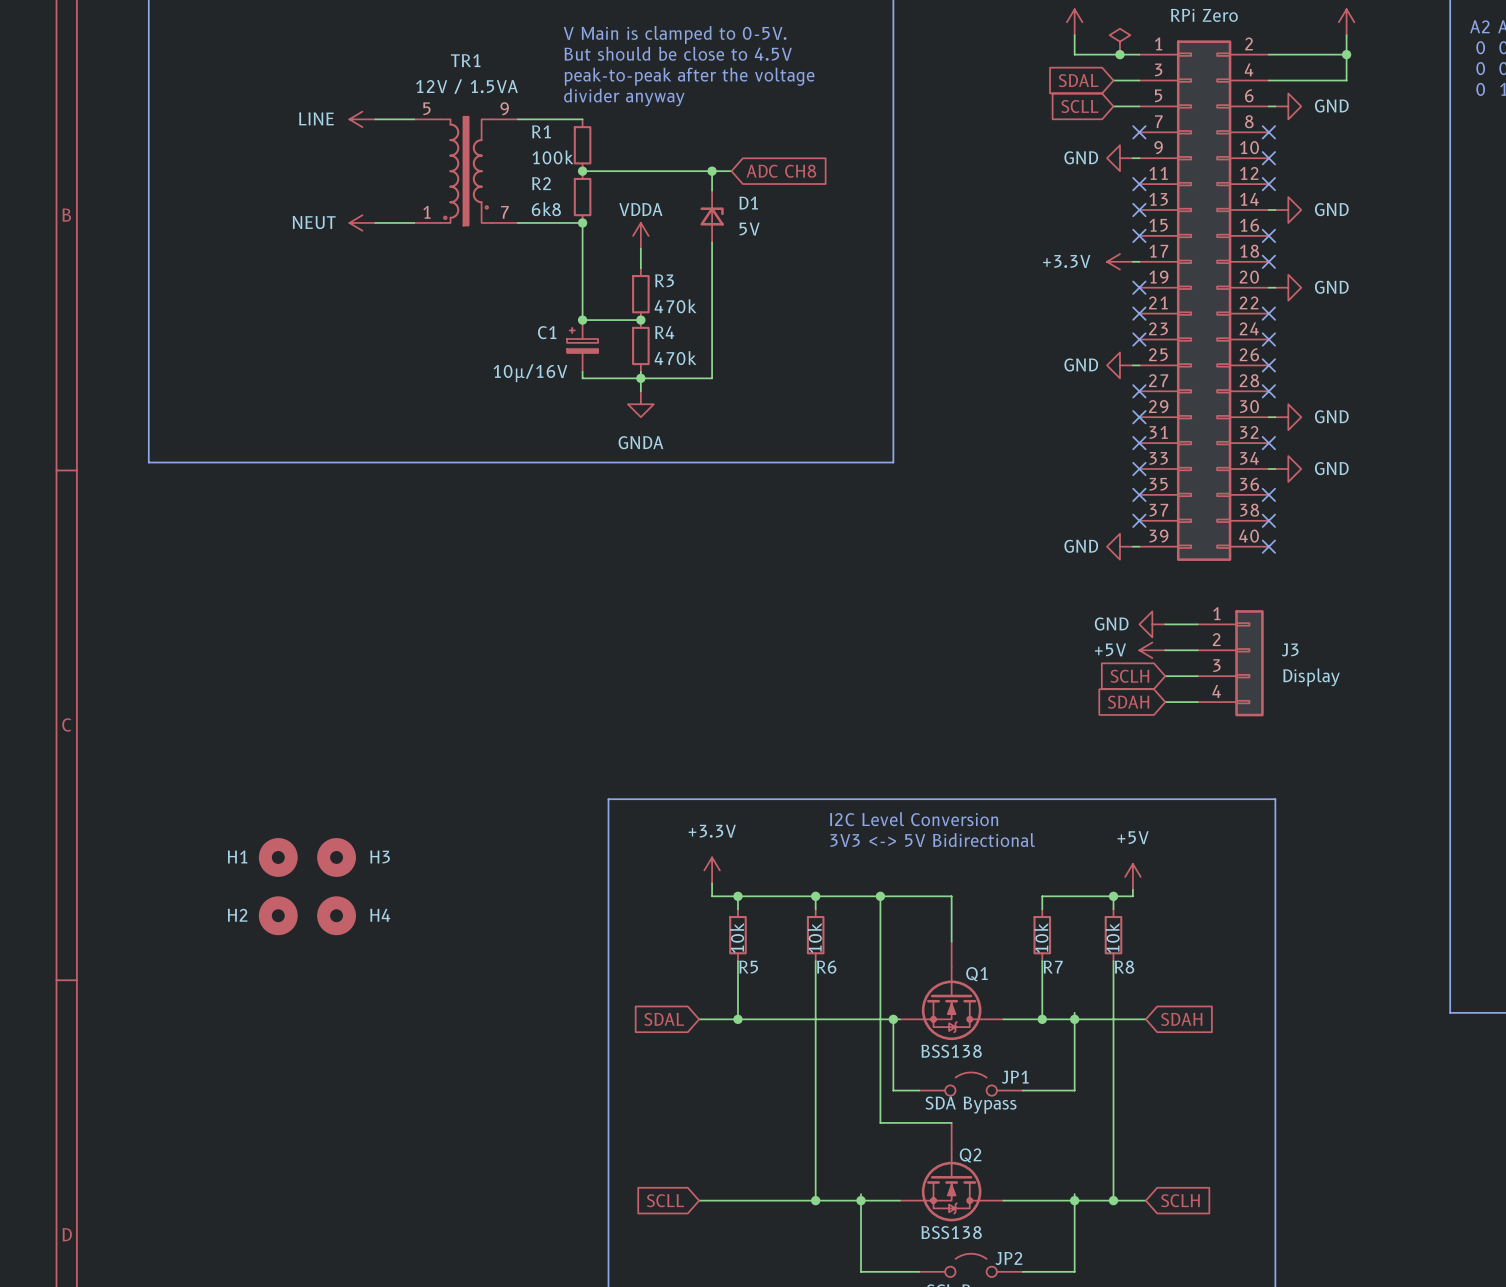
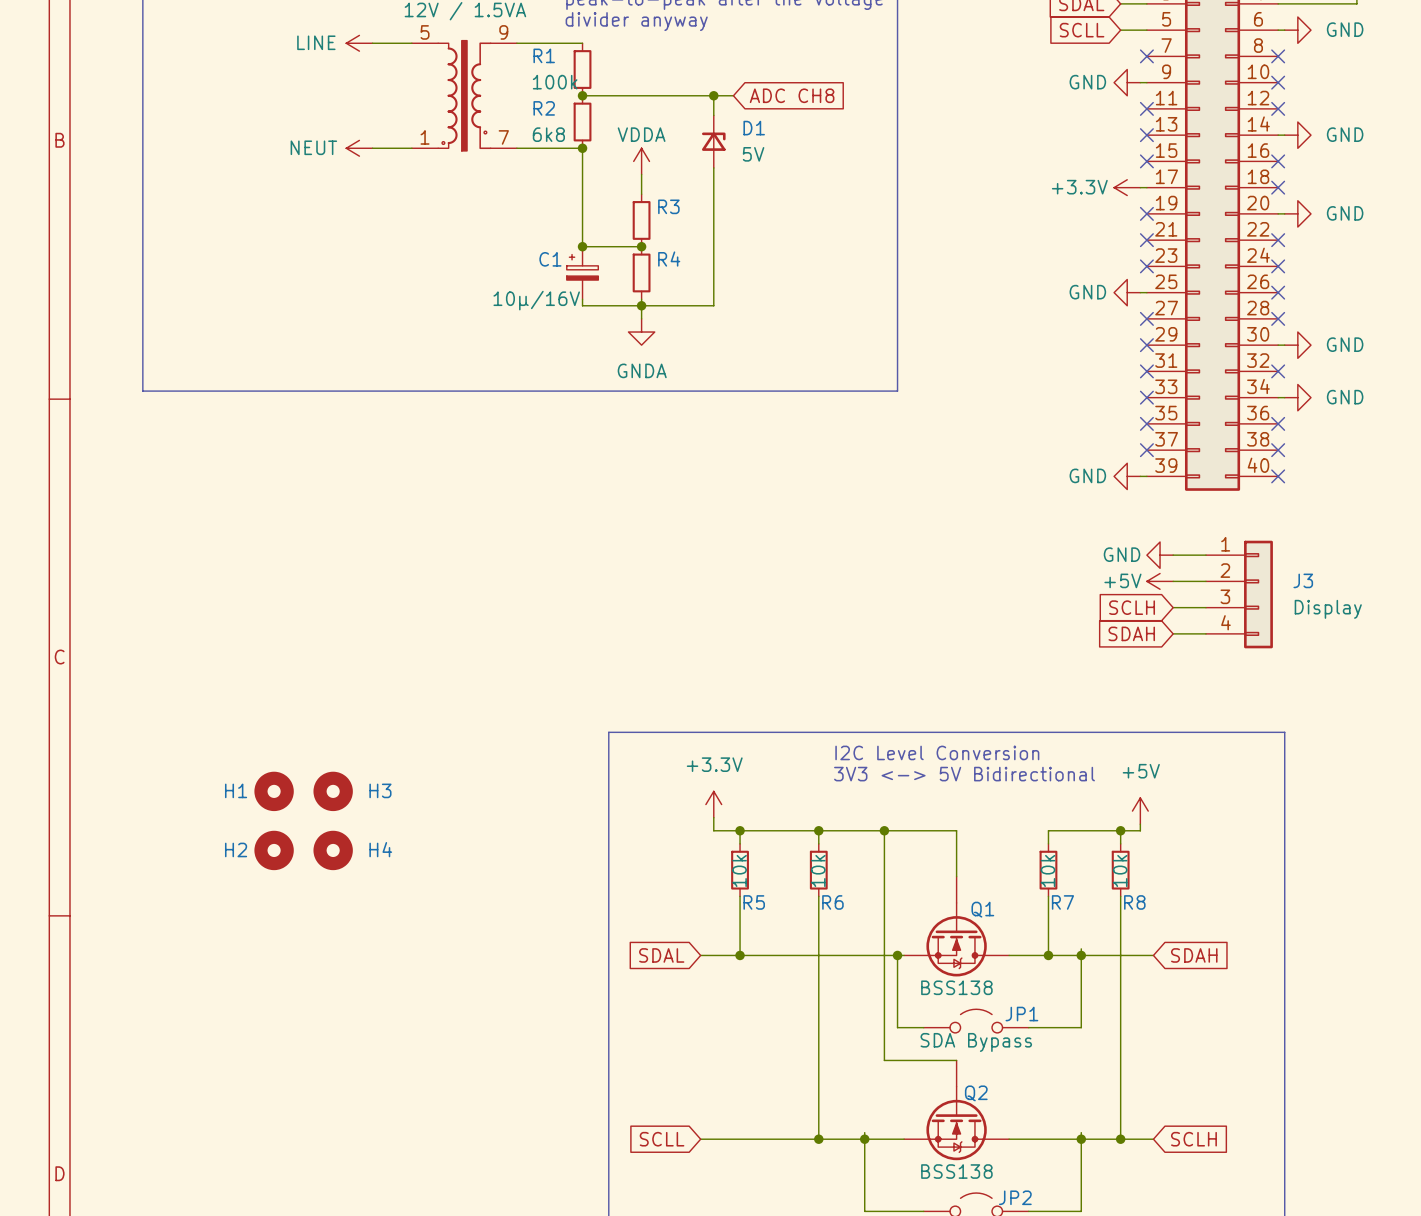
R3 value: 470k (675, 306) -> none
R4 value: 470k (675, 358) -> none

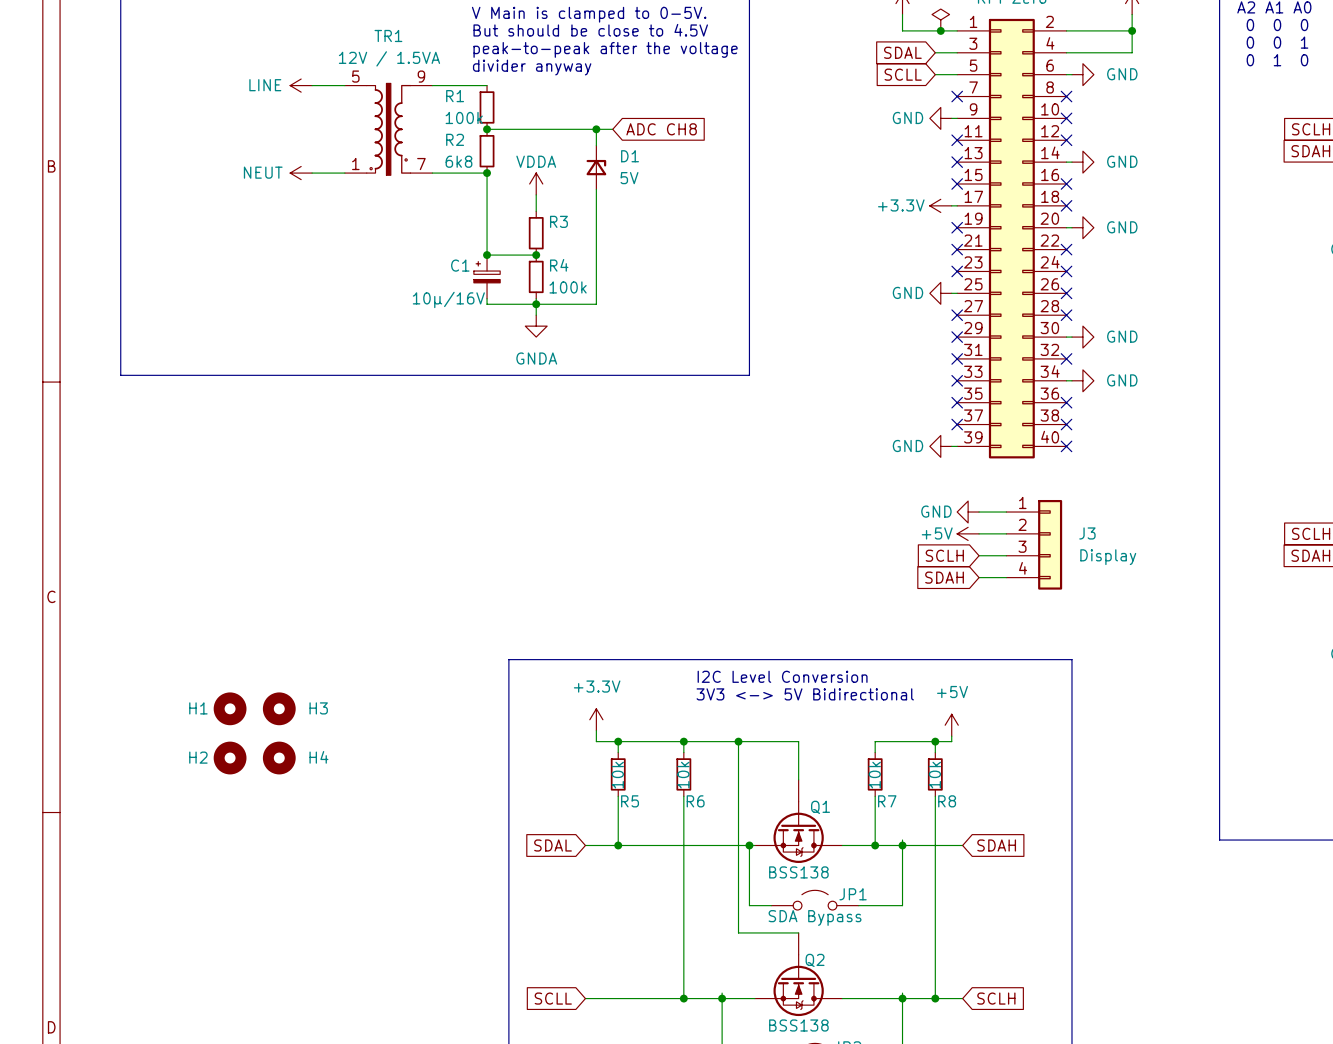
R4 value: none -> 100k (568, 287)

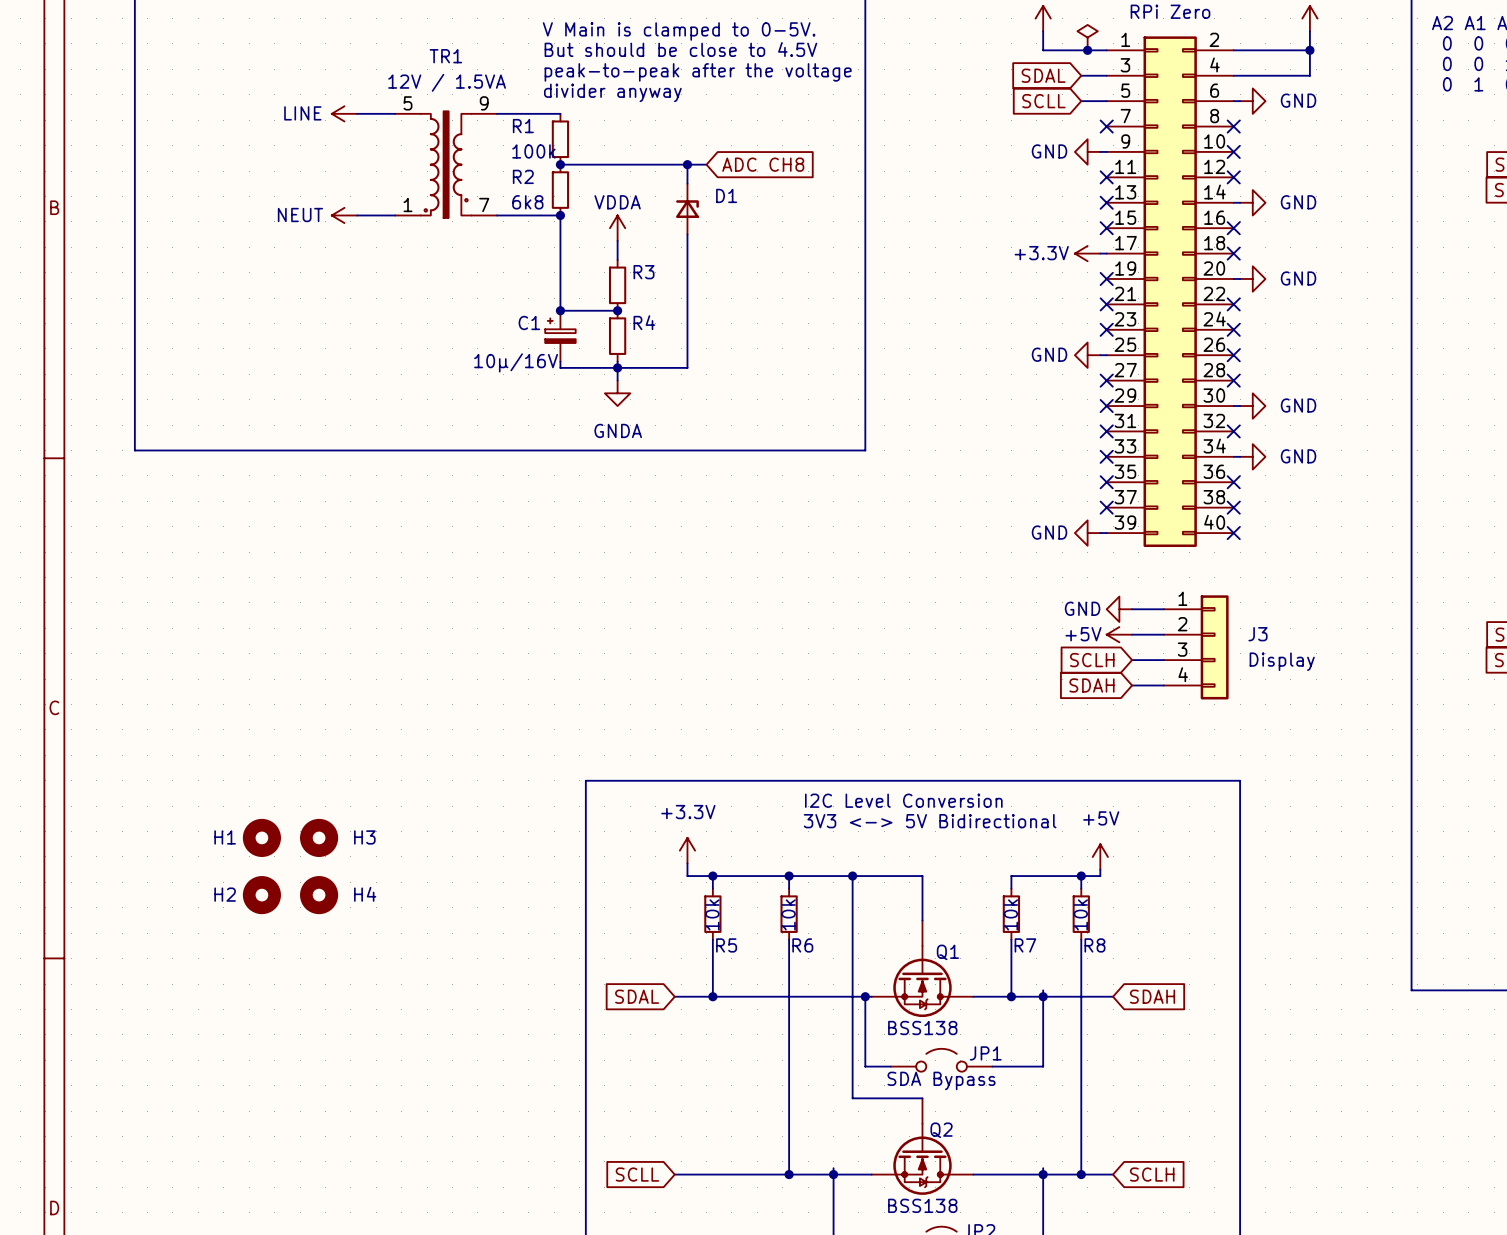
D1 value: 5V (629, 178) -> none
R4 value: 100k (568, 287) -> none

